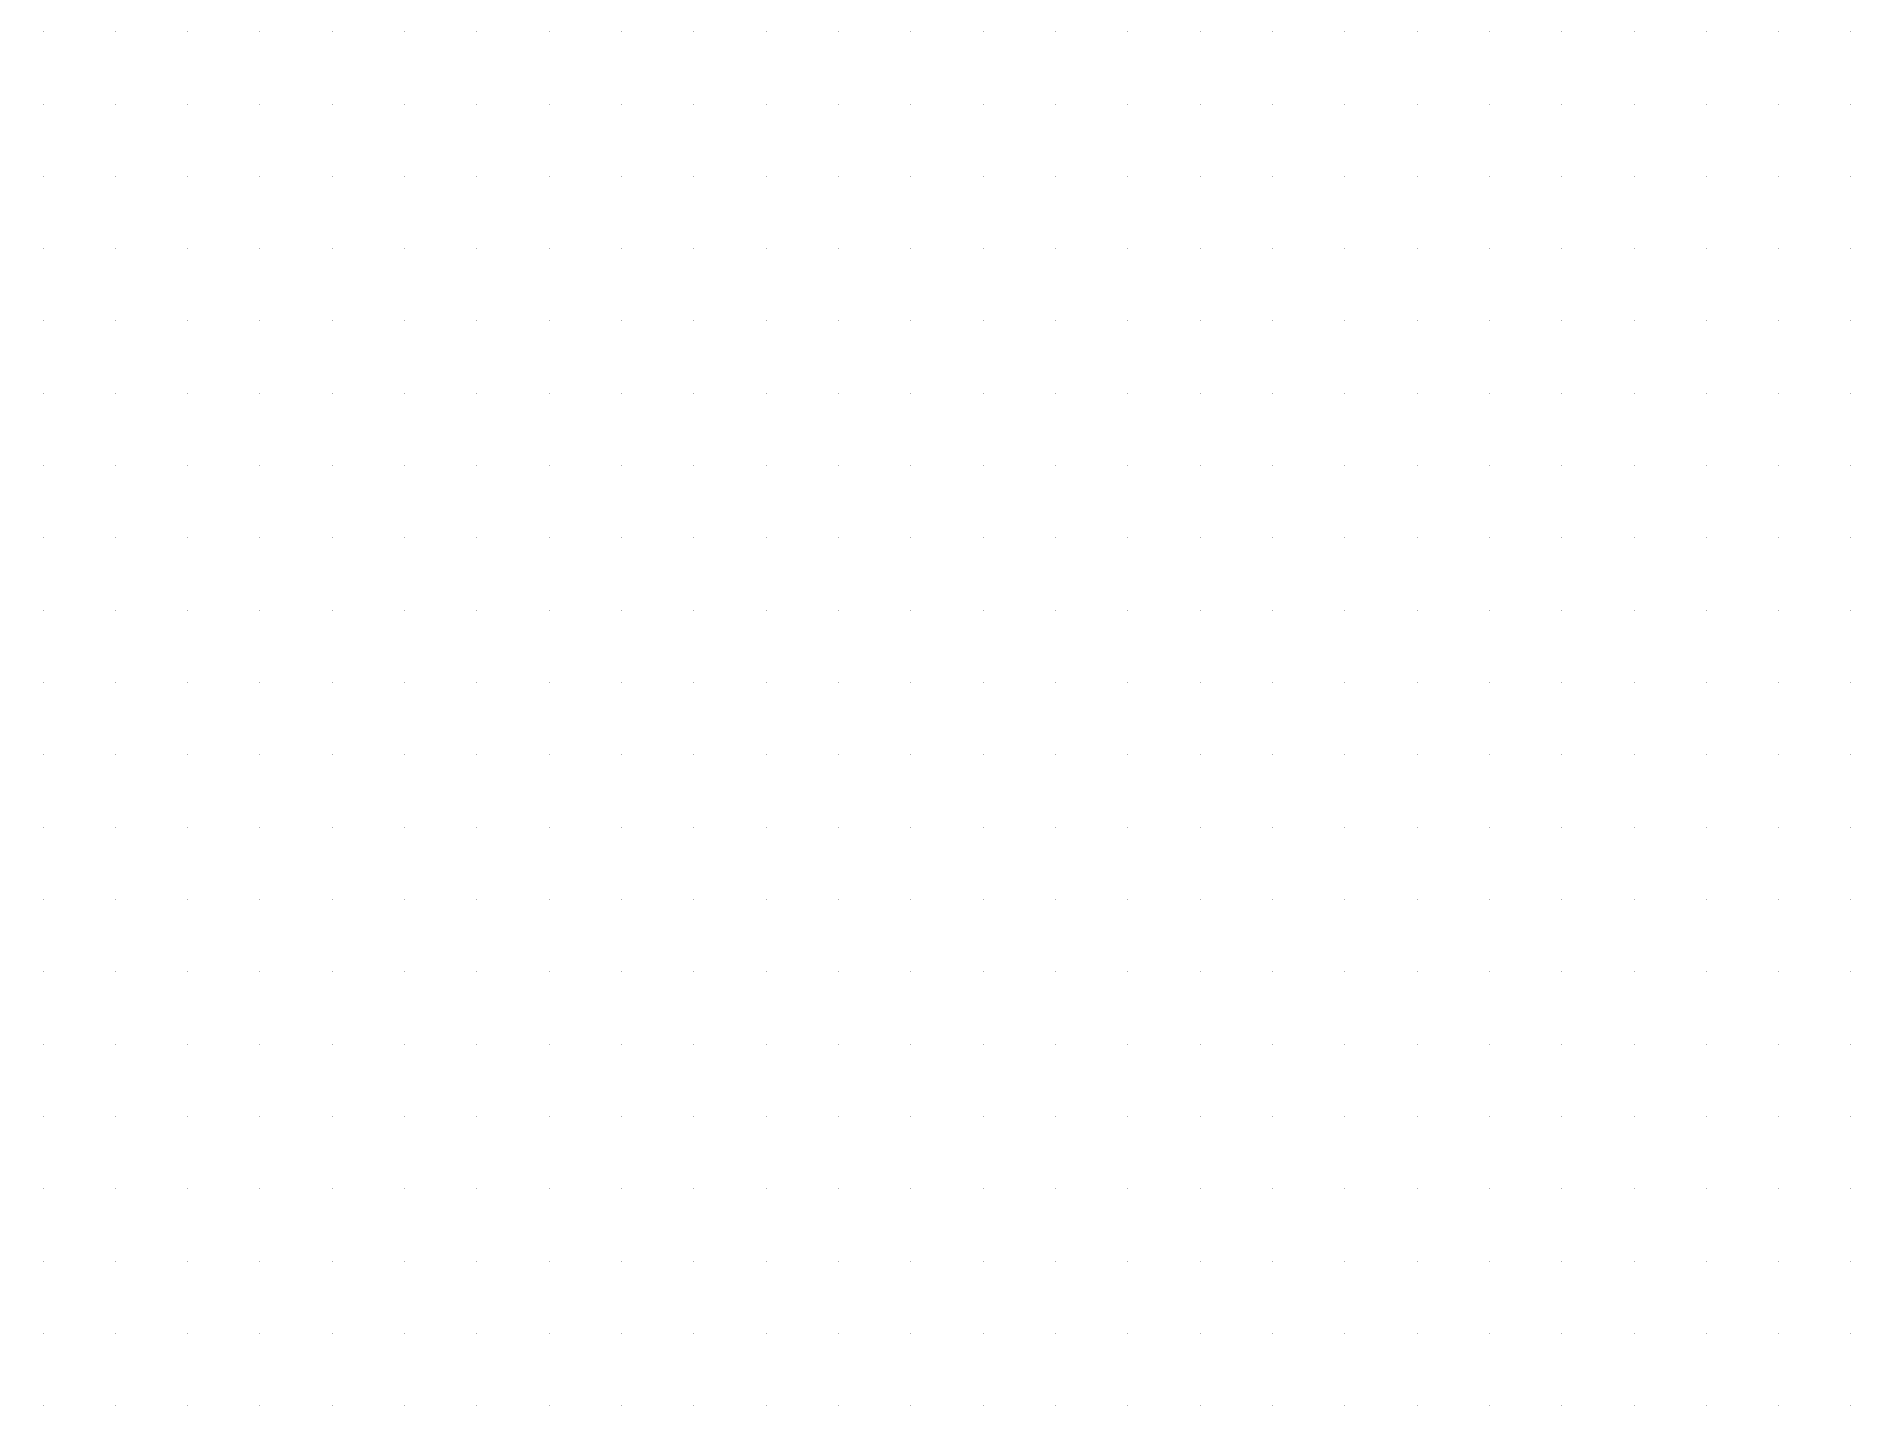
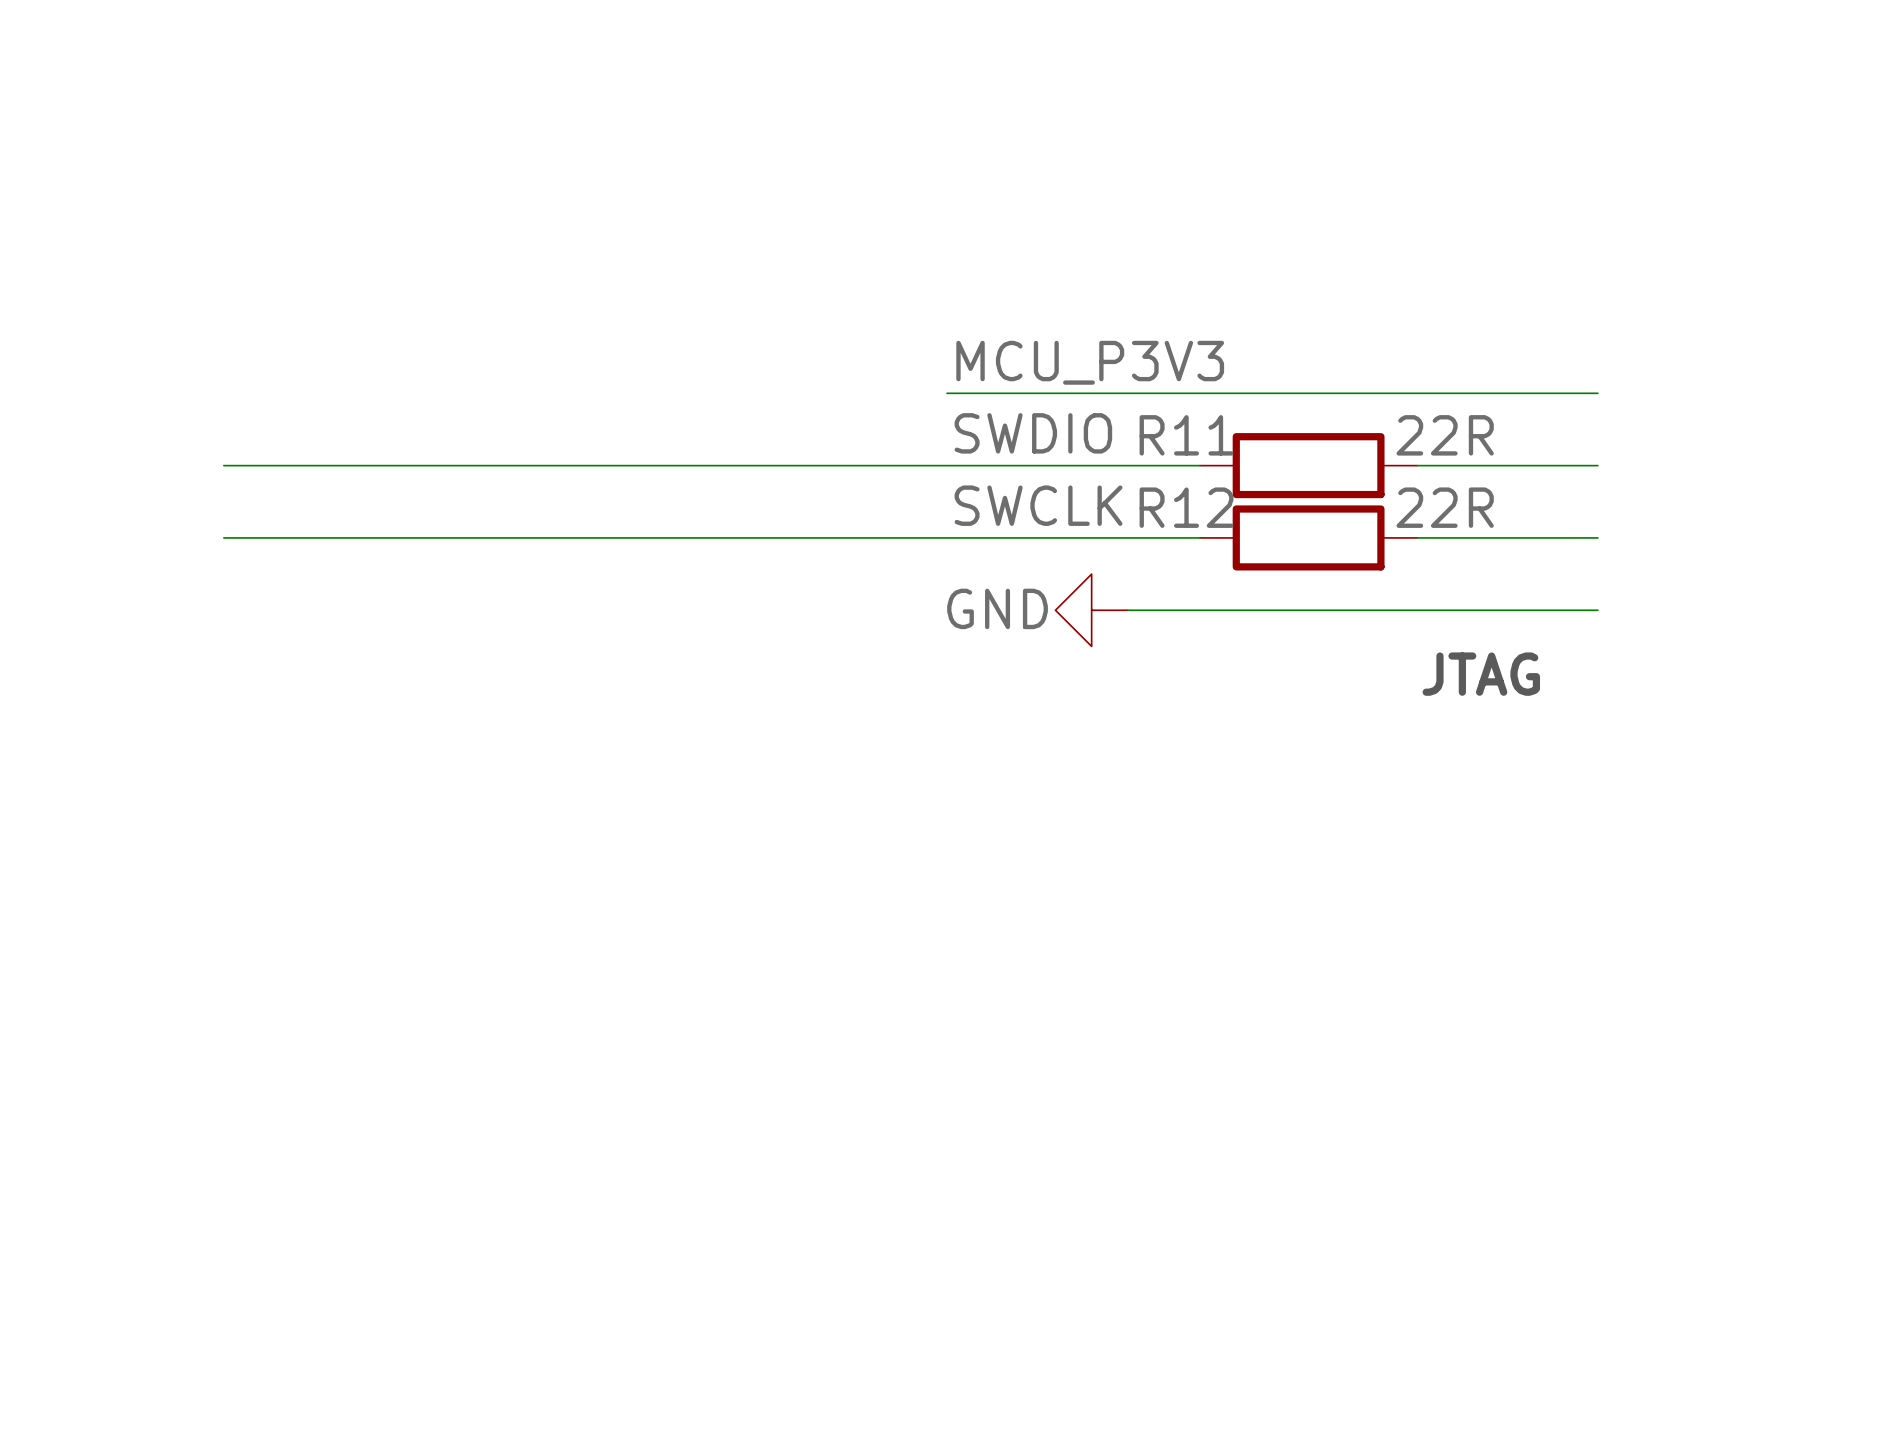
label: none -> MCU_P3V3 (1090, 362)
wire: none -> (947, 393) (1597, 393)
label: none -> SWDIO (1033, 433)
wire: none -> (223, 465) (1200, 465)
R11: none -> 22R (1308, 465)
wire: none -> (1417, 465) (1597, 465)
label: none -> SWCLK (1038, 505)
wire: none -> (223, 537) (1200, 537)
R12: none -> 22R (1308, 537)
wire: none -> (1417, 537) (1597, 537)
power symbol: none -> GND (1091, 610)
wire: none -> (1127, 610) (1597, 610)
text: none -> JTAG (1481, 674)

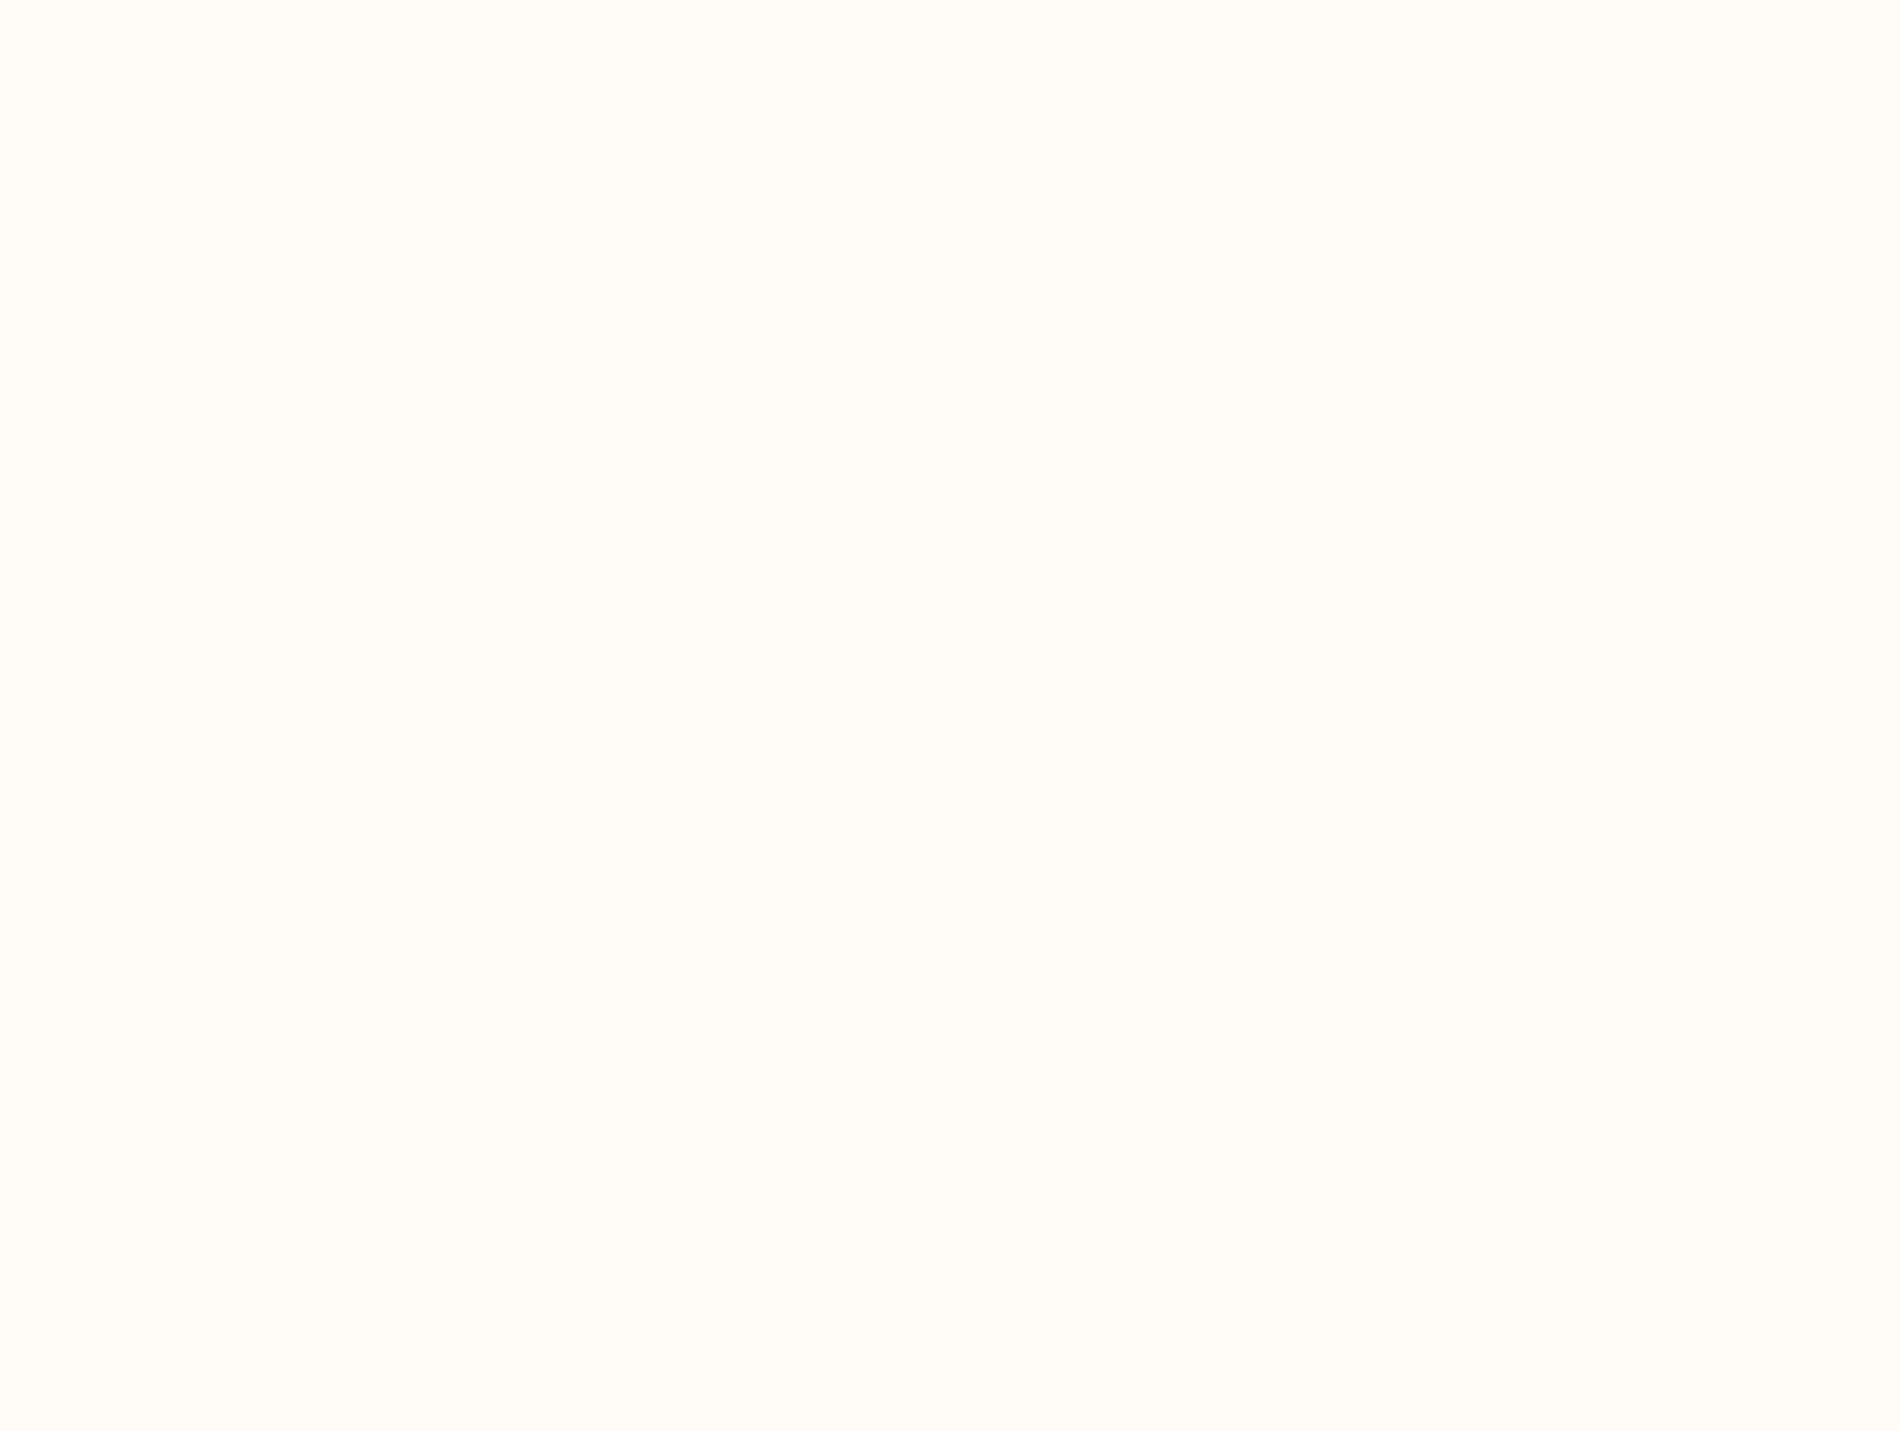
label: MCU_P3V3 (1090, 362) -> none
wire: (947, 393) (1597, 393) -> none
label: SWDIO (1033, 433) -> none
wire: (223, 465) (1200, 465) -> none
R11: 22R (1308, 465) -> none
wire: (1417, 465) (1597, 465) -> none
label: SWCLK (1038, 505) -> none
wire: (223, 537) (1200, 537) -> none
R12: 22R (1308, 537) -> none
wire: (1417, 537) (1597, 537) -> none
power symbol: GND (1091, 610) -> none
wire: (1127, 610) (1597, 610) -> none
text: JTAG (1481, 674) -> none

